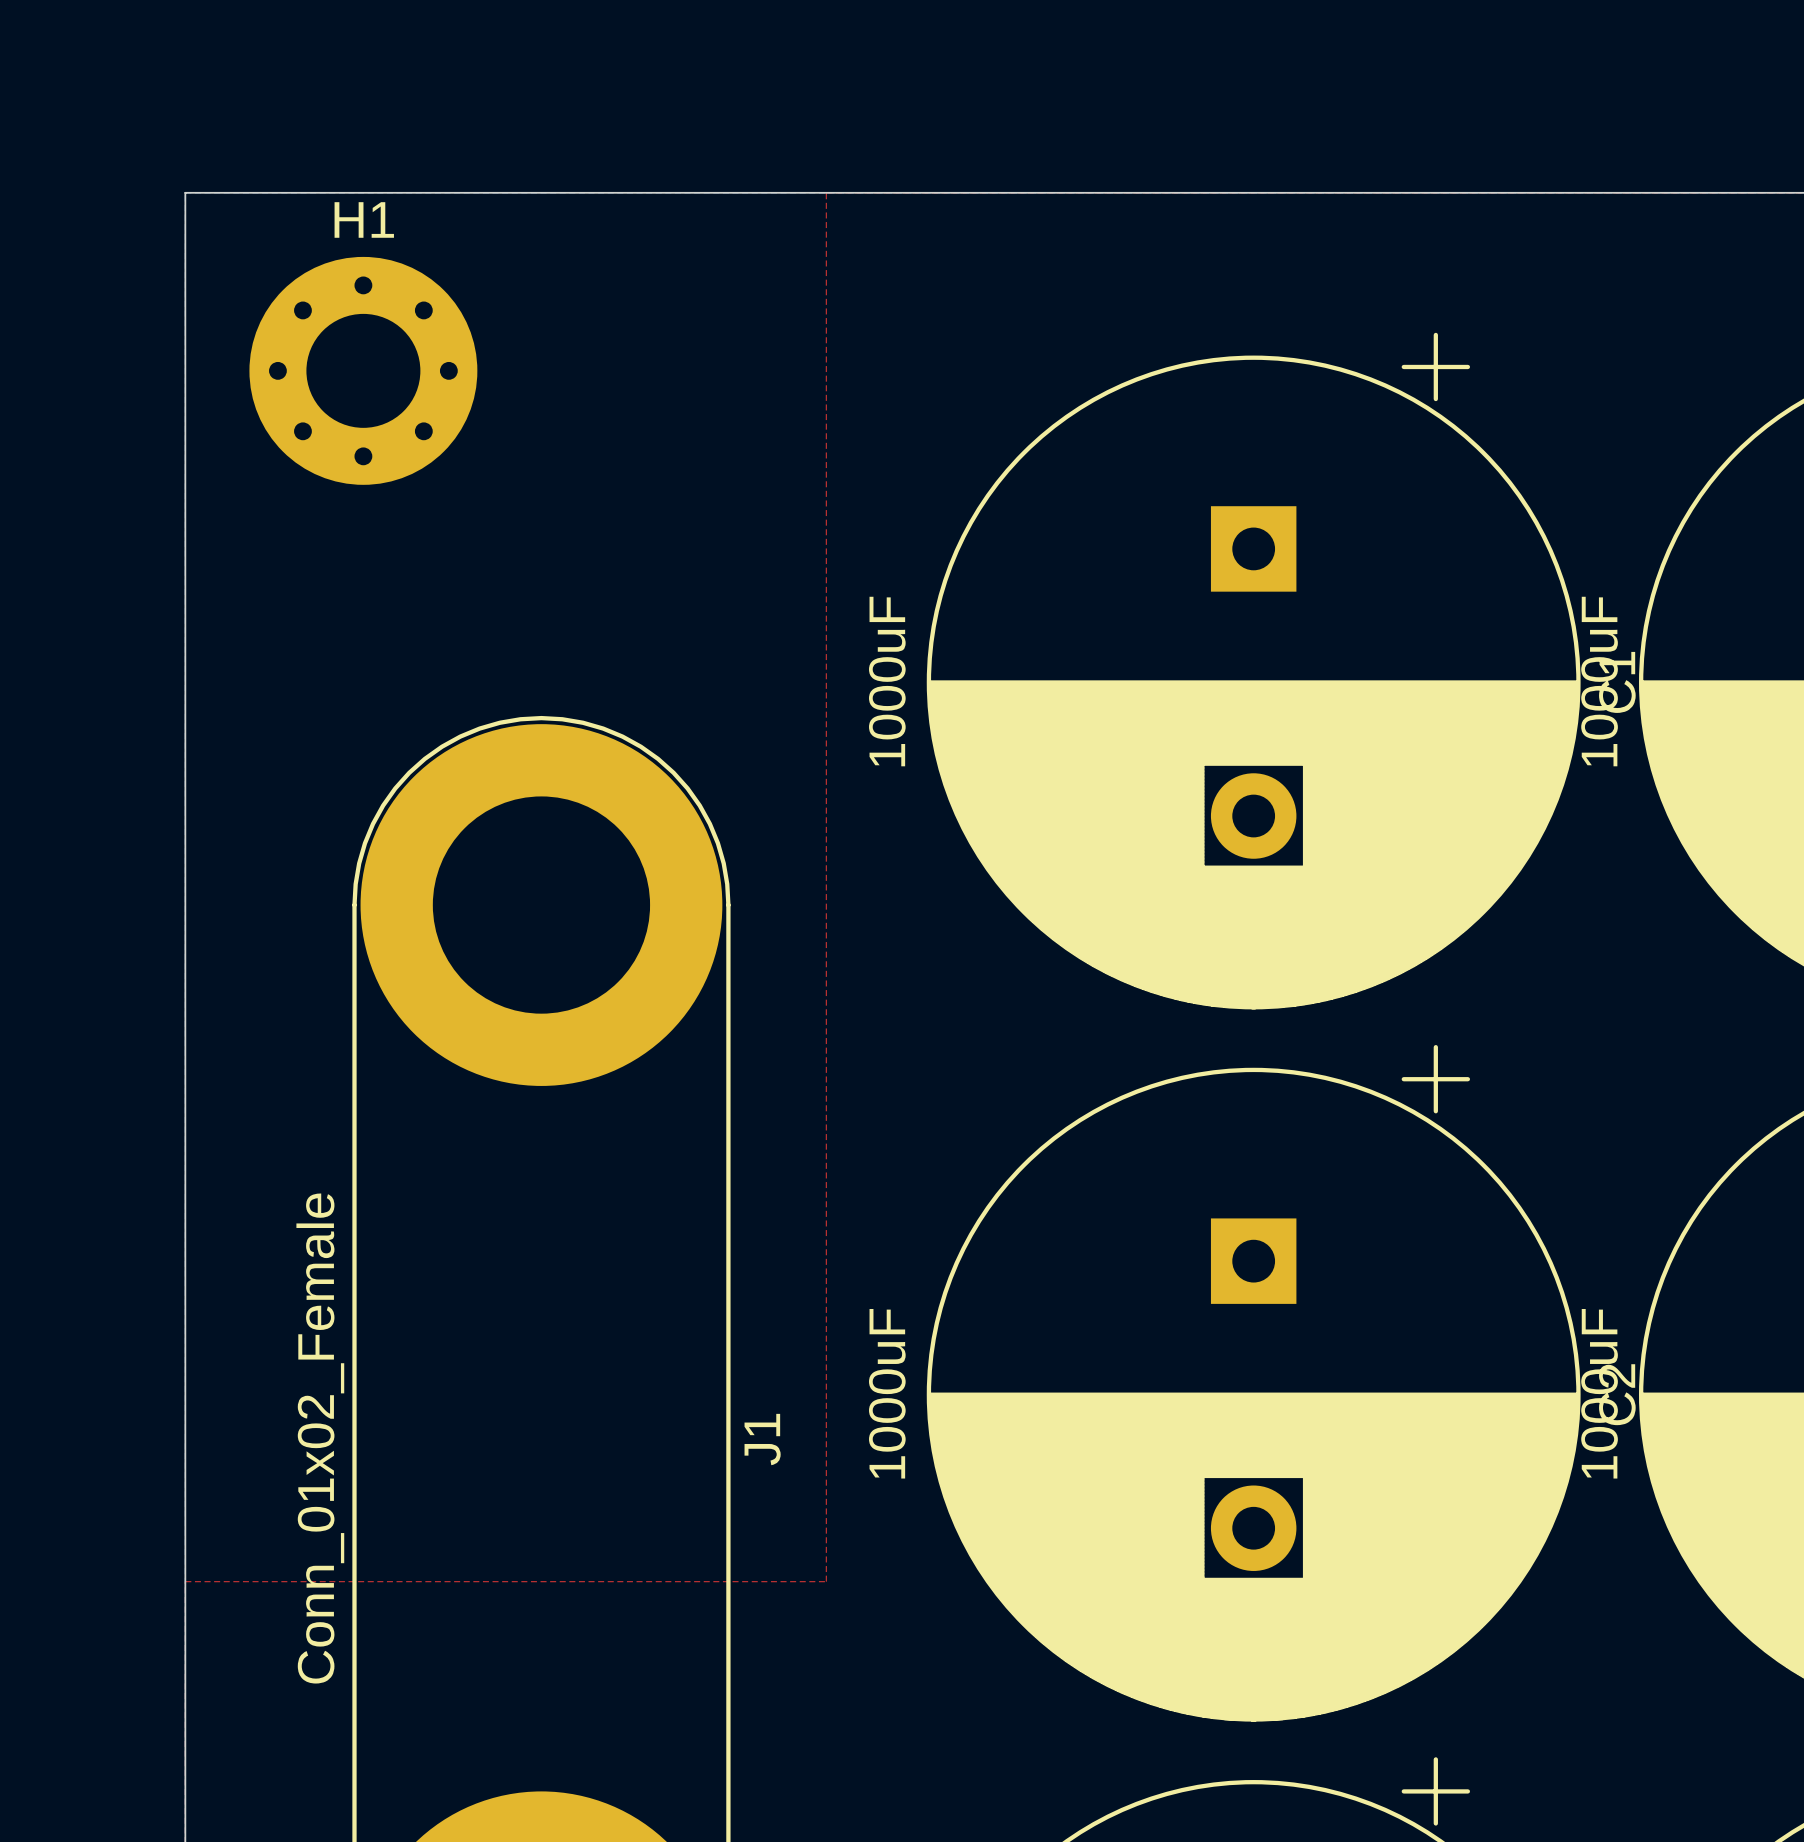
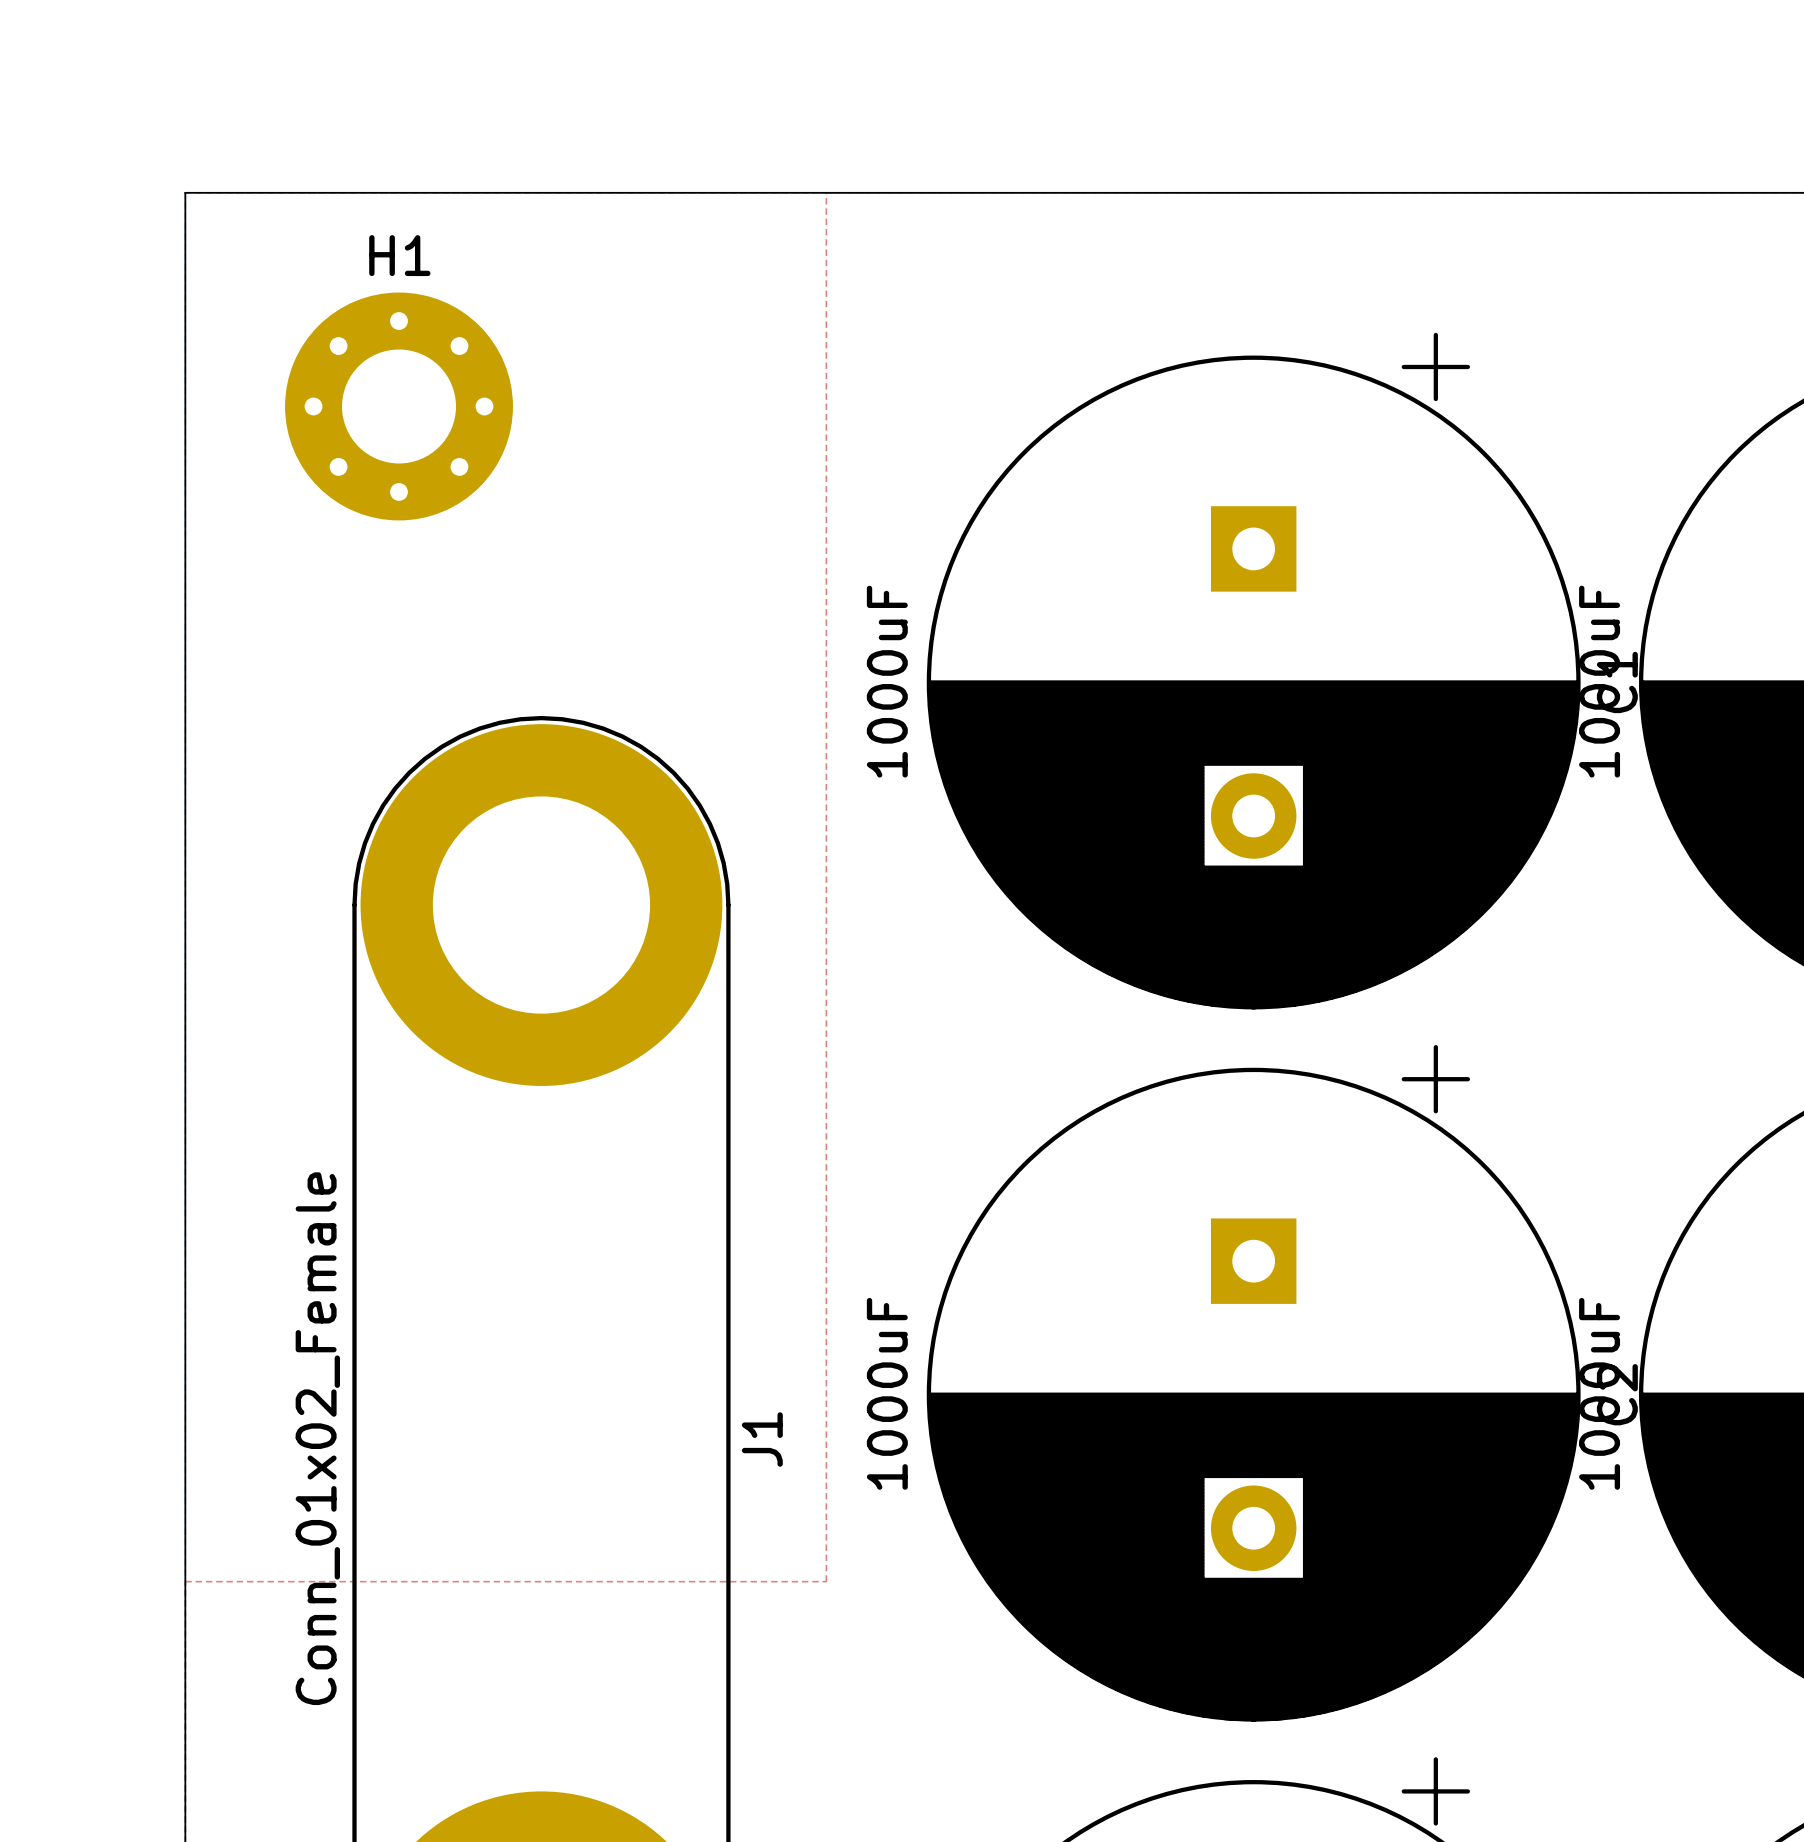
H1 position: (363, 370) -> (399, 406)

